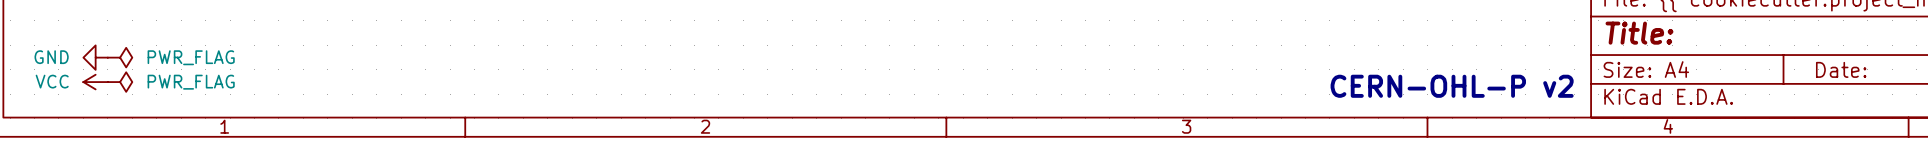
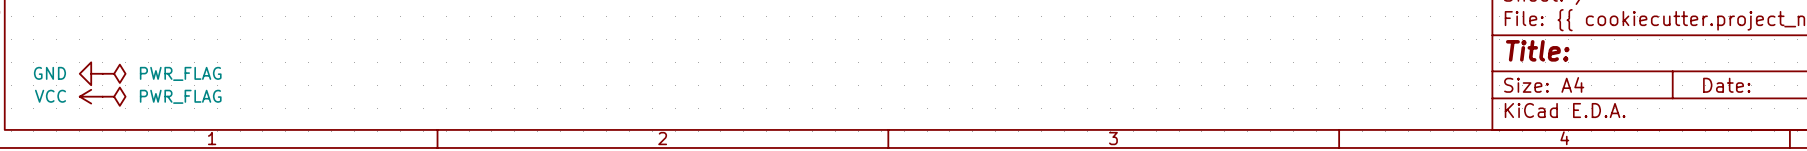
text: CERN-OHL-P v2 (1452, 86) -> none

